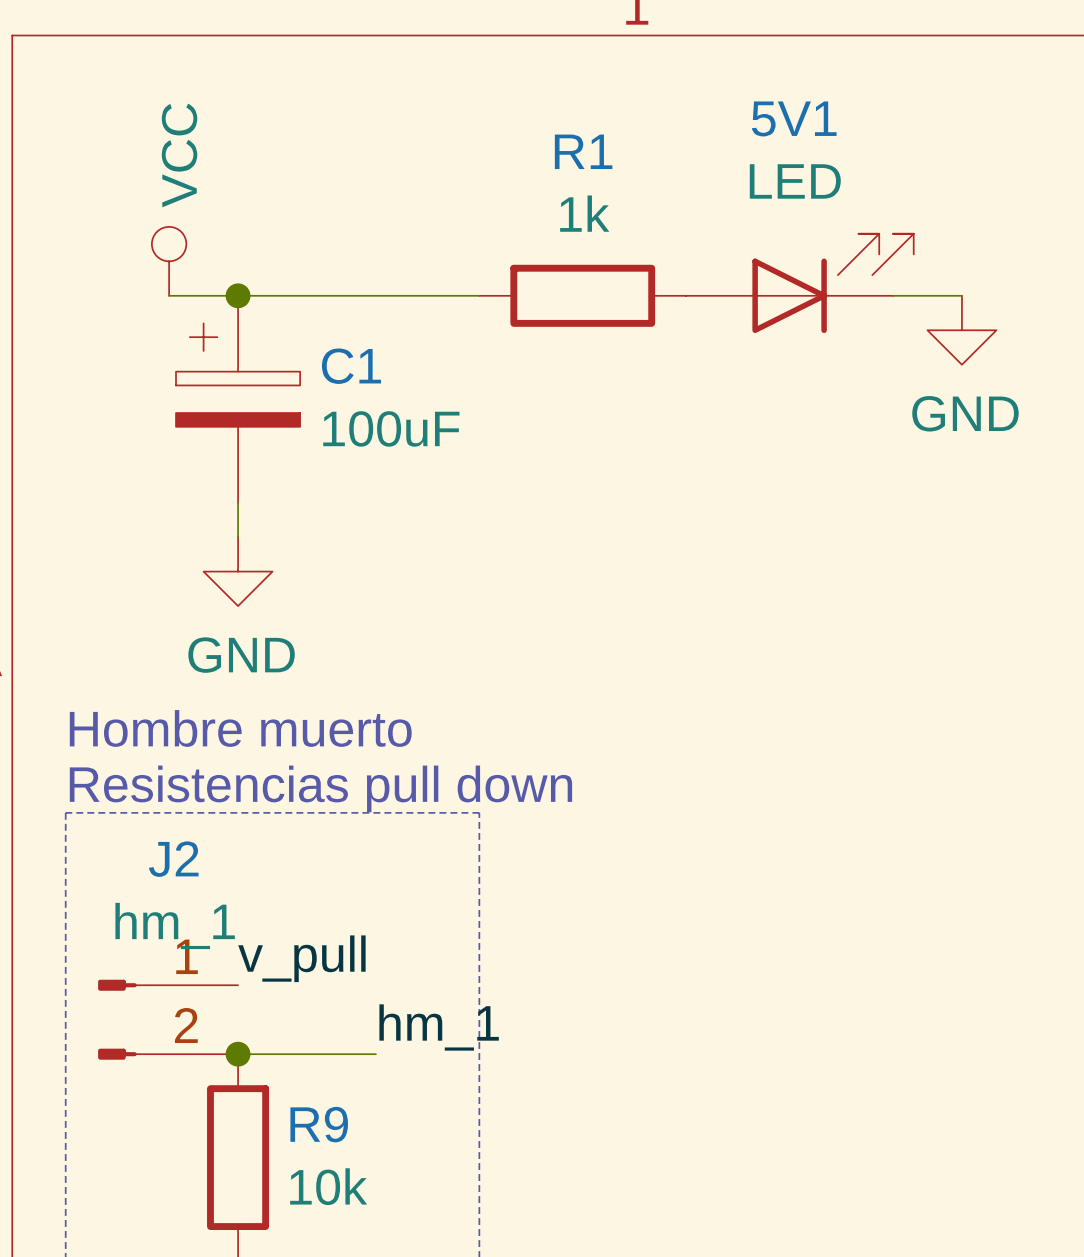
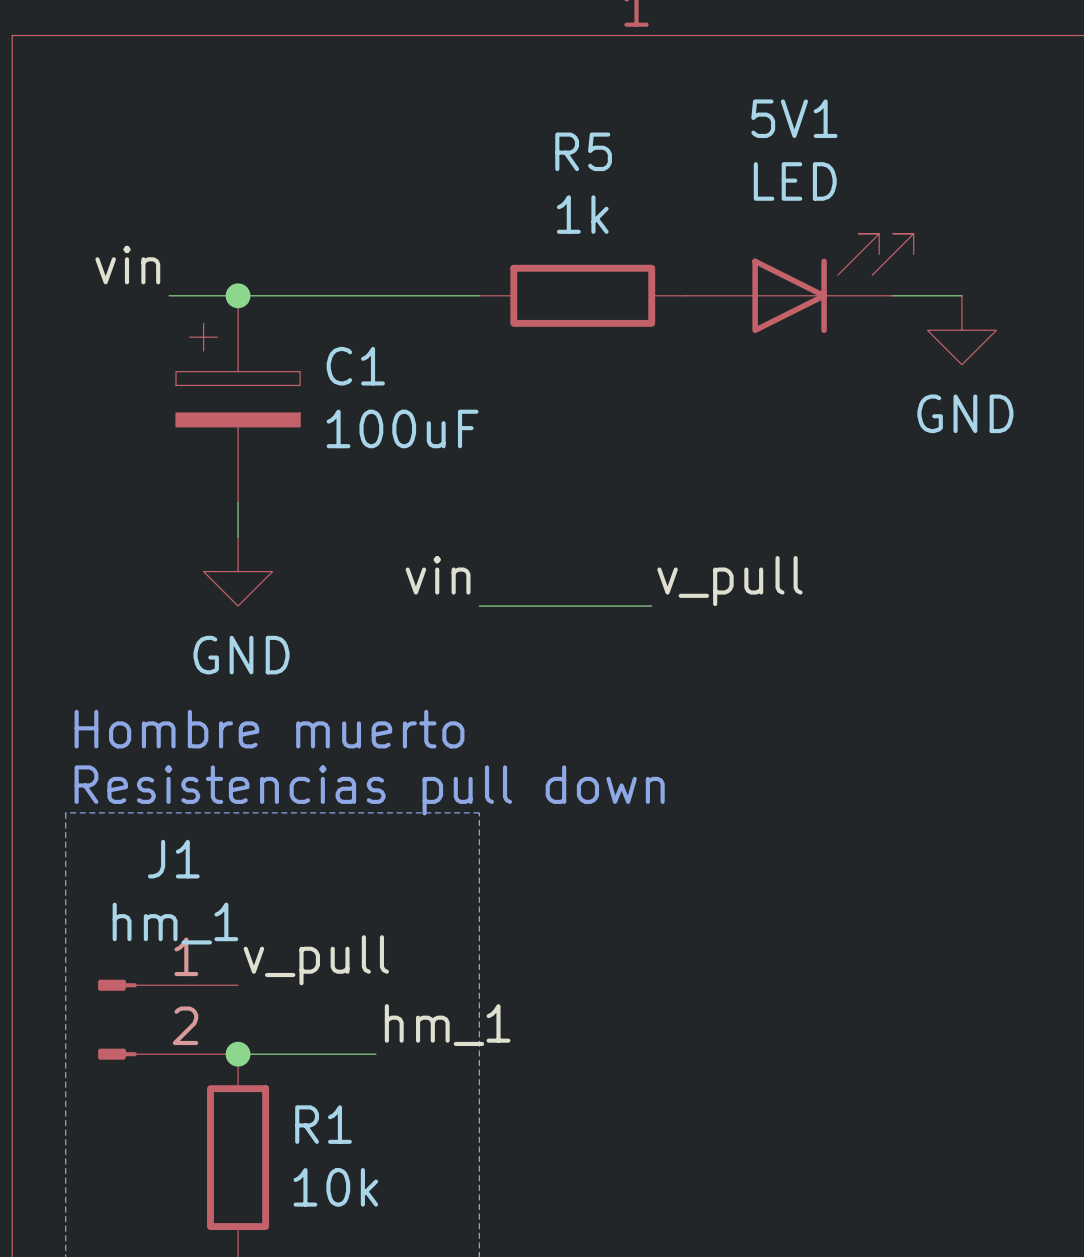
R1 name: R1 (583, 151) -> R5 (583, 151)
power symbol: VCC (169, 261) -> none
label: none -> vin (127, 265)
label: none -> vin (438, 575)
label: none -> v_pull (729, 581)
wire: none -> (479, 606) (651, 606)
J2 name: J2 (173, 859) -> J1 (173, 859)
R9 name: R9 (319, 1124) -> R1 (323, 1124)

